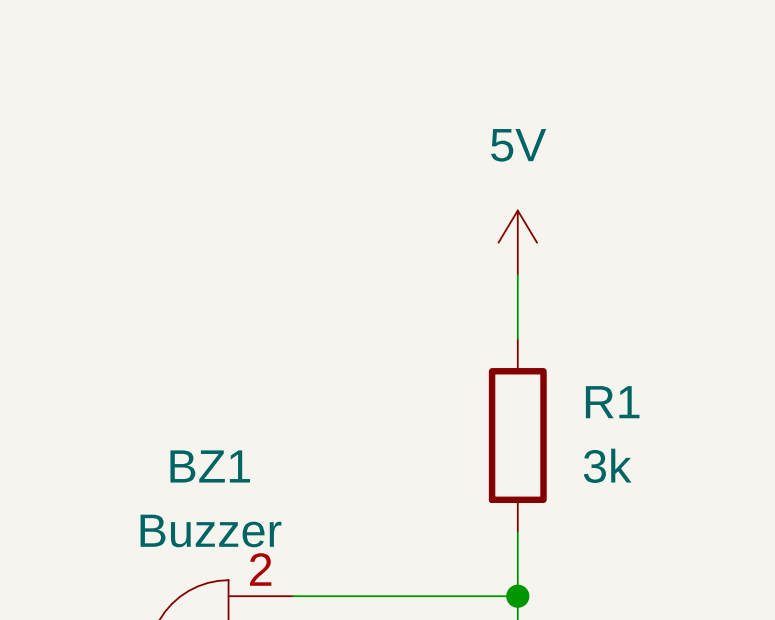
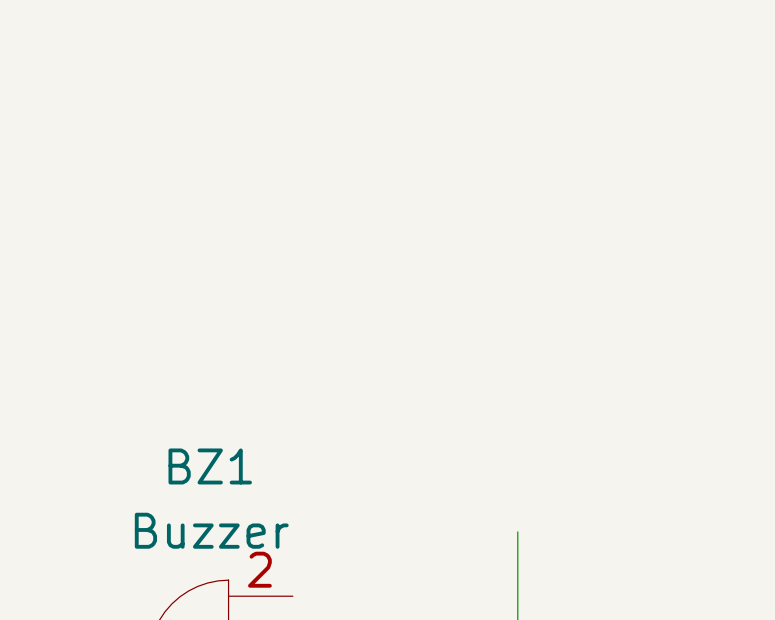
power symbol: 5V (517, 242) -> none
wire: (517, 274) (517, 339) -> none
R1: 3k (517, 435) -> none
wire: (292, 596) (517, 596) -> none
junction: (517, 596) -> none

